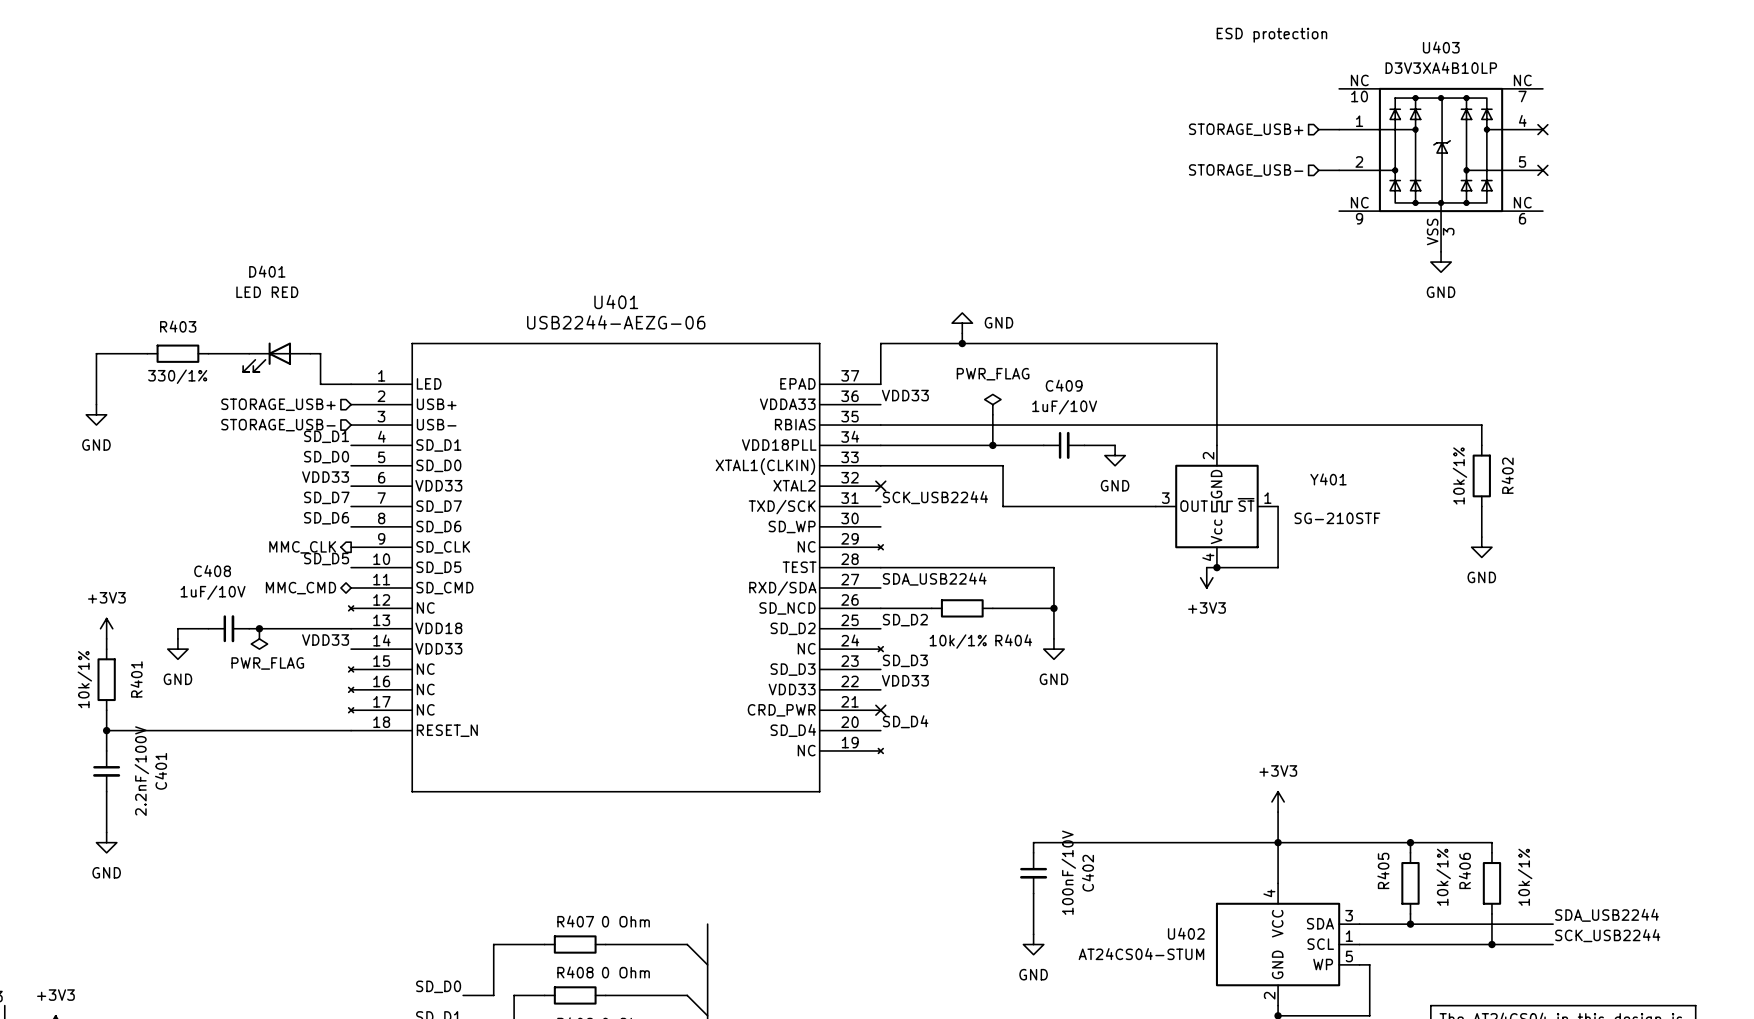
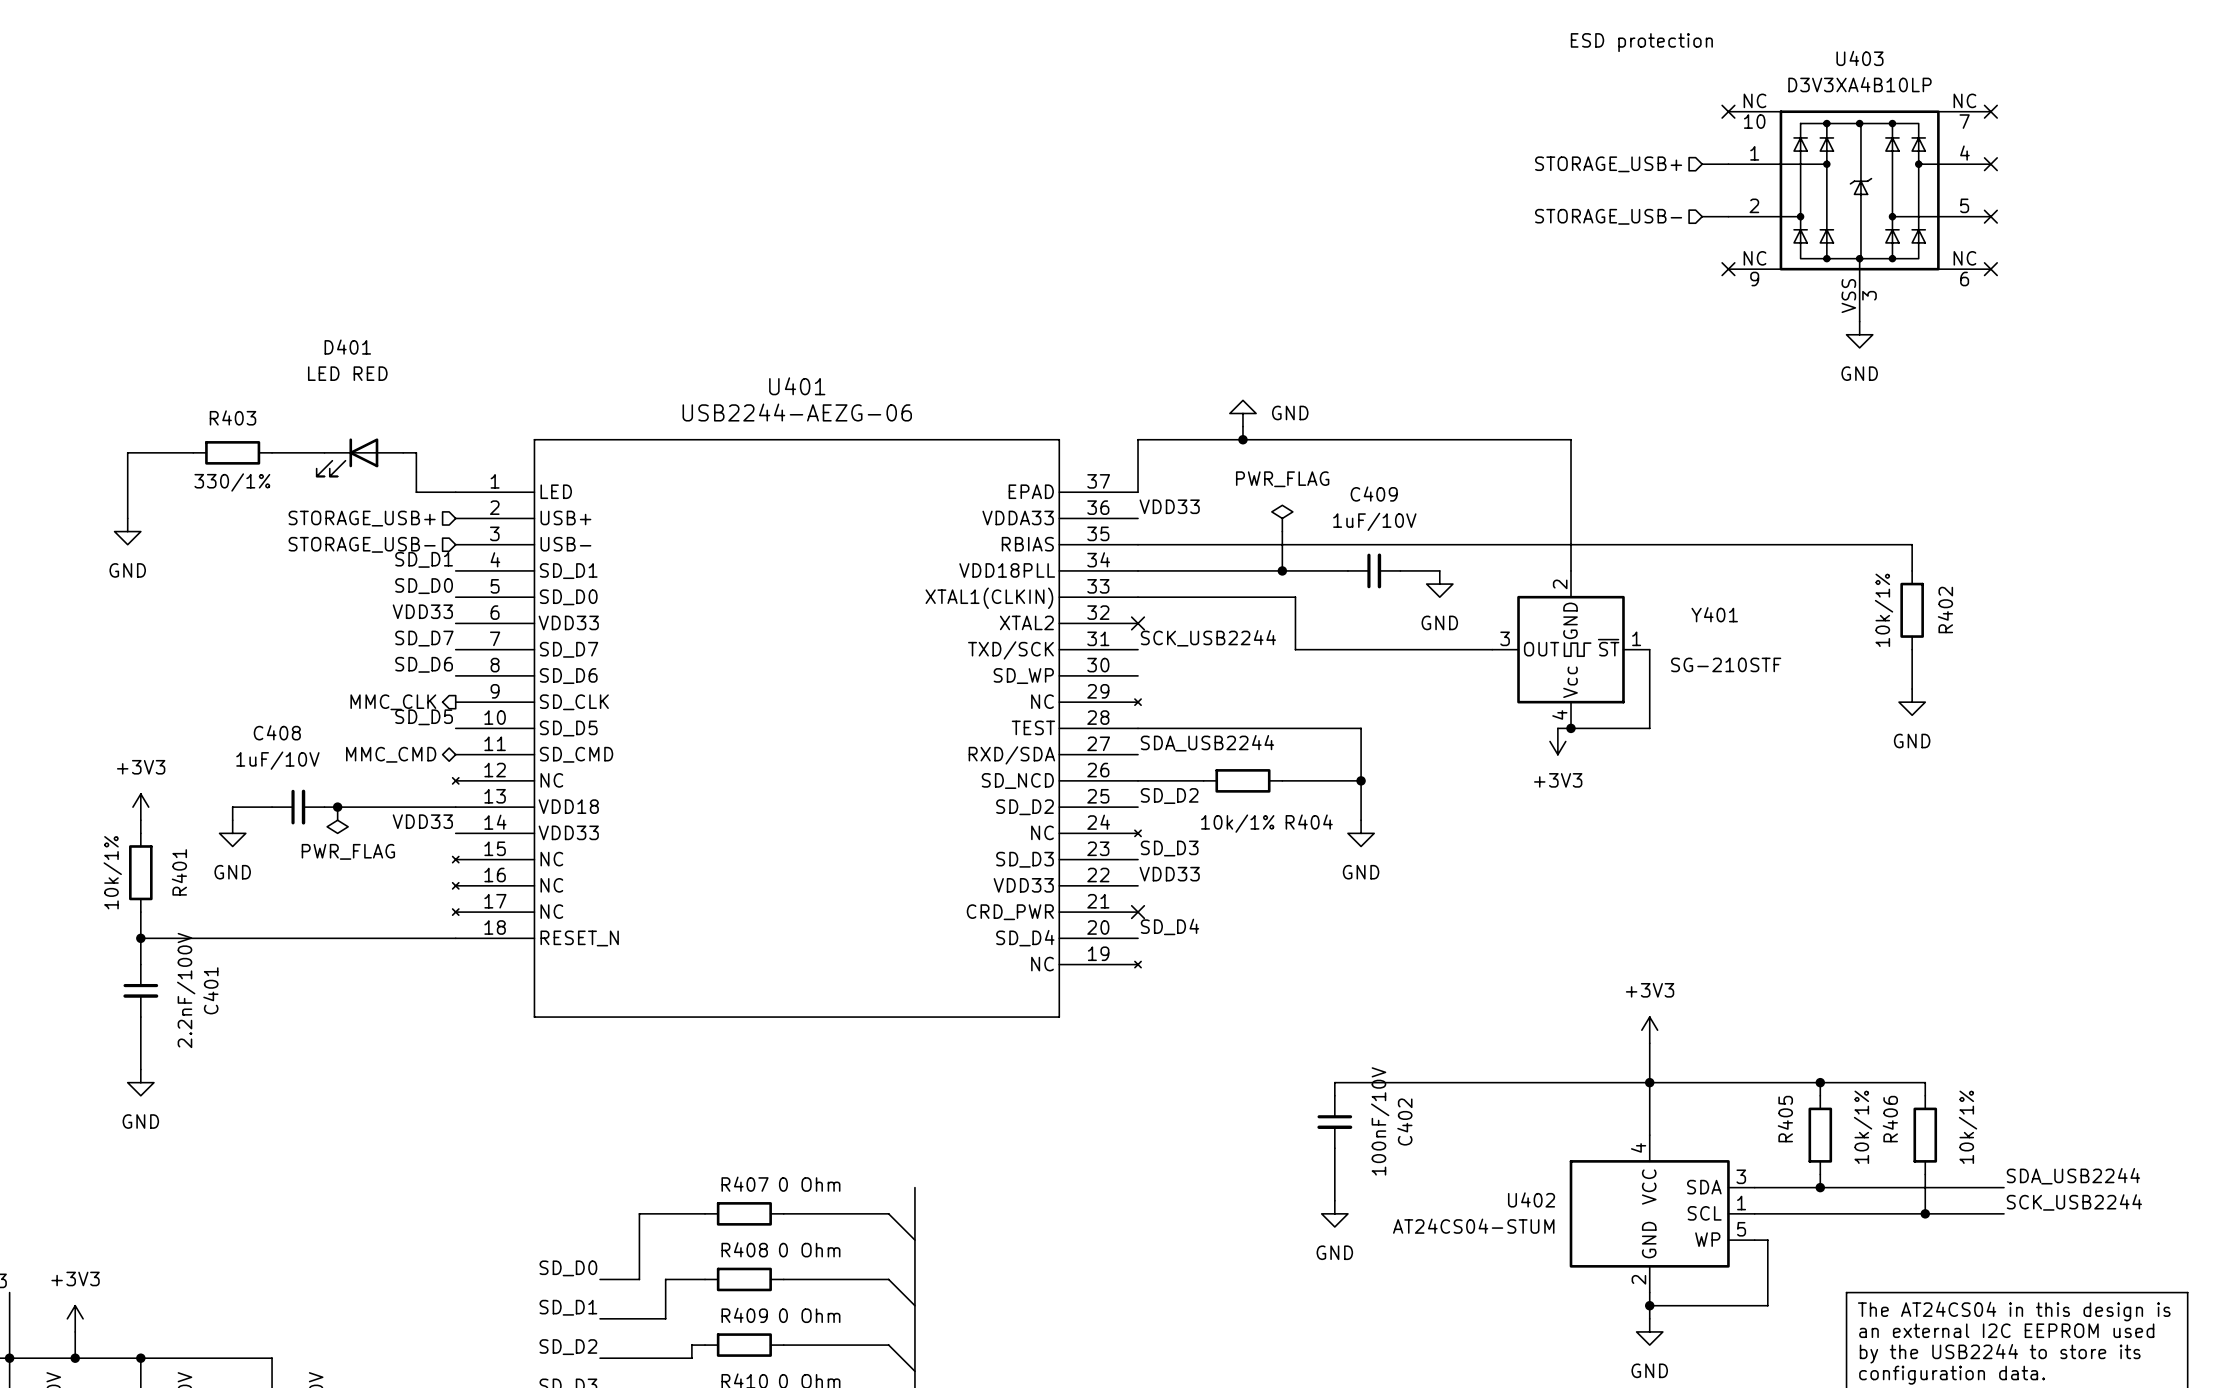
no-connect mark: none -> (1728, 111)
no-connect mark: none -> (1990, 111)
no-connect mark: none -> (1728, 269)
no-connect mark: none -> (1990, 269)

